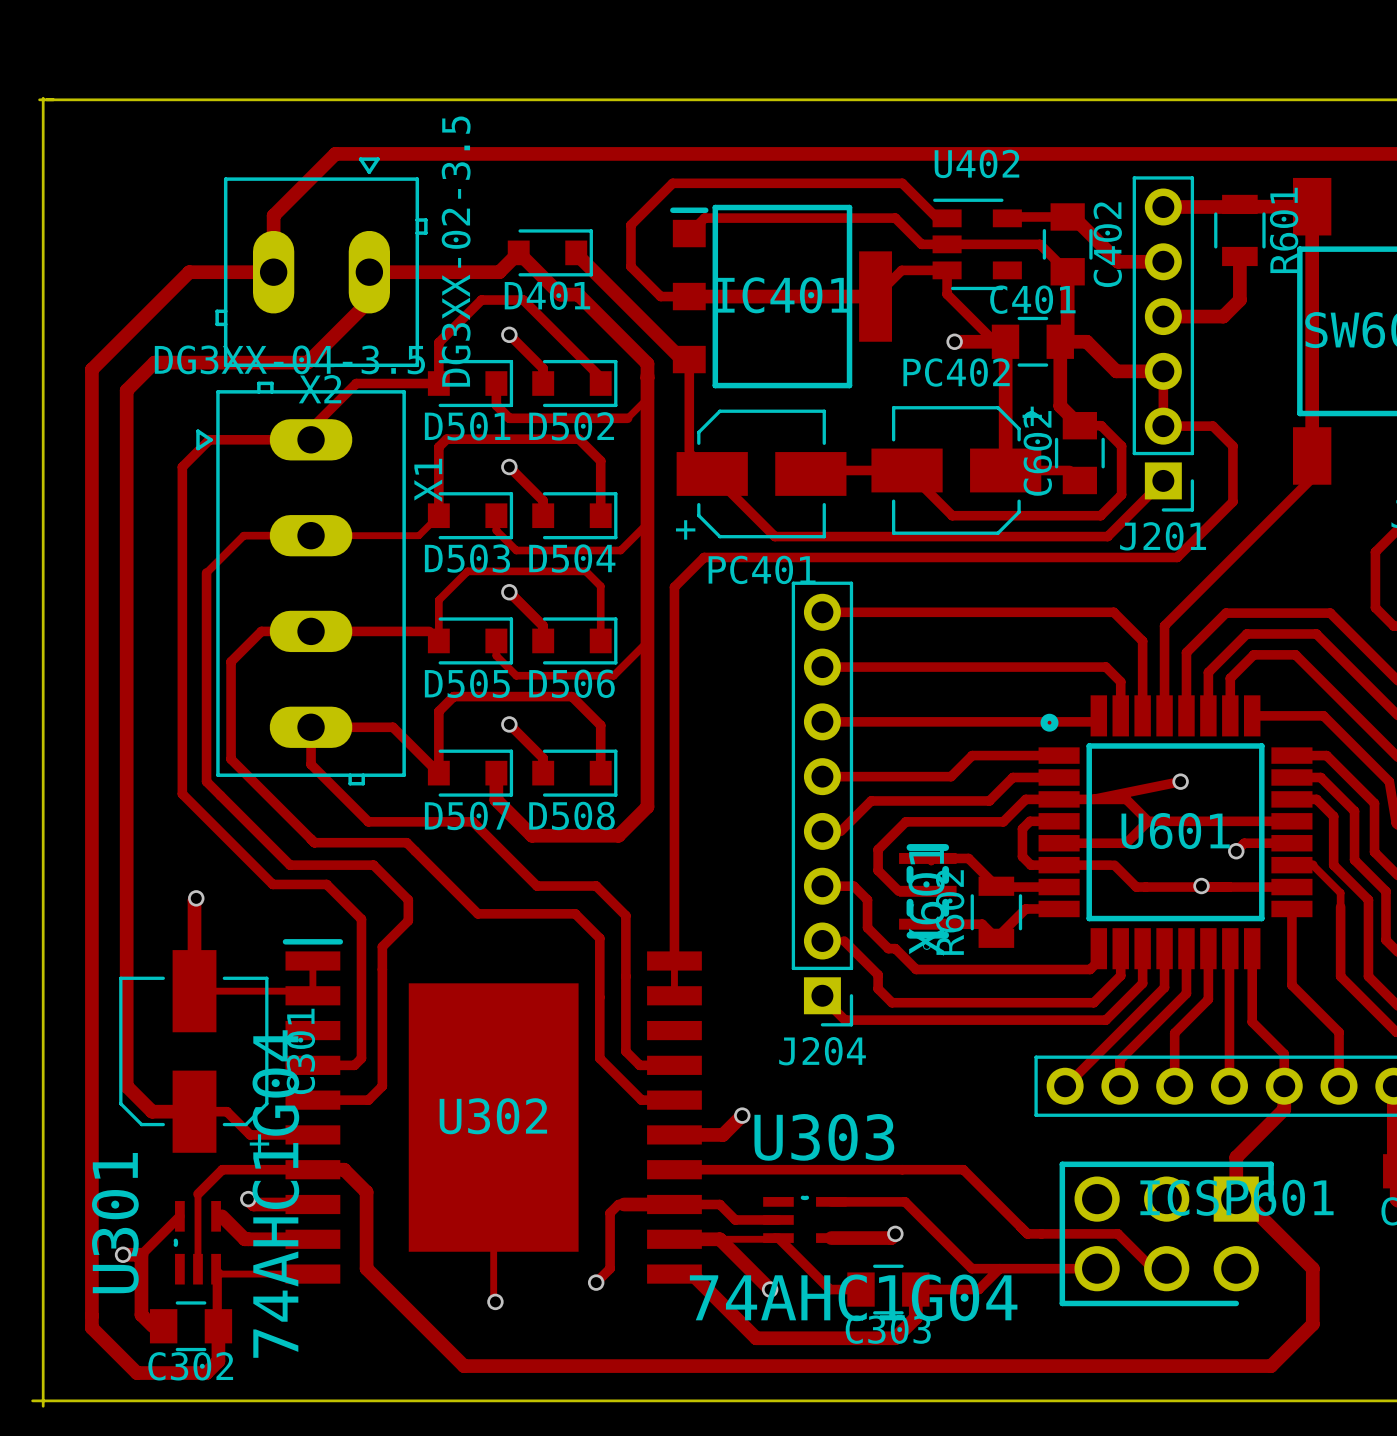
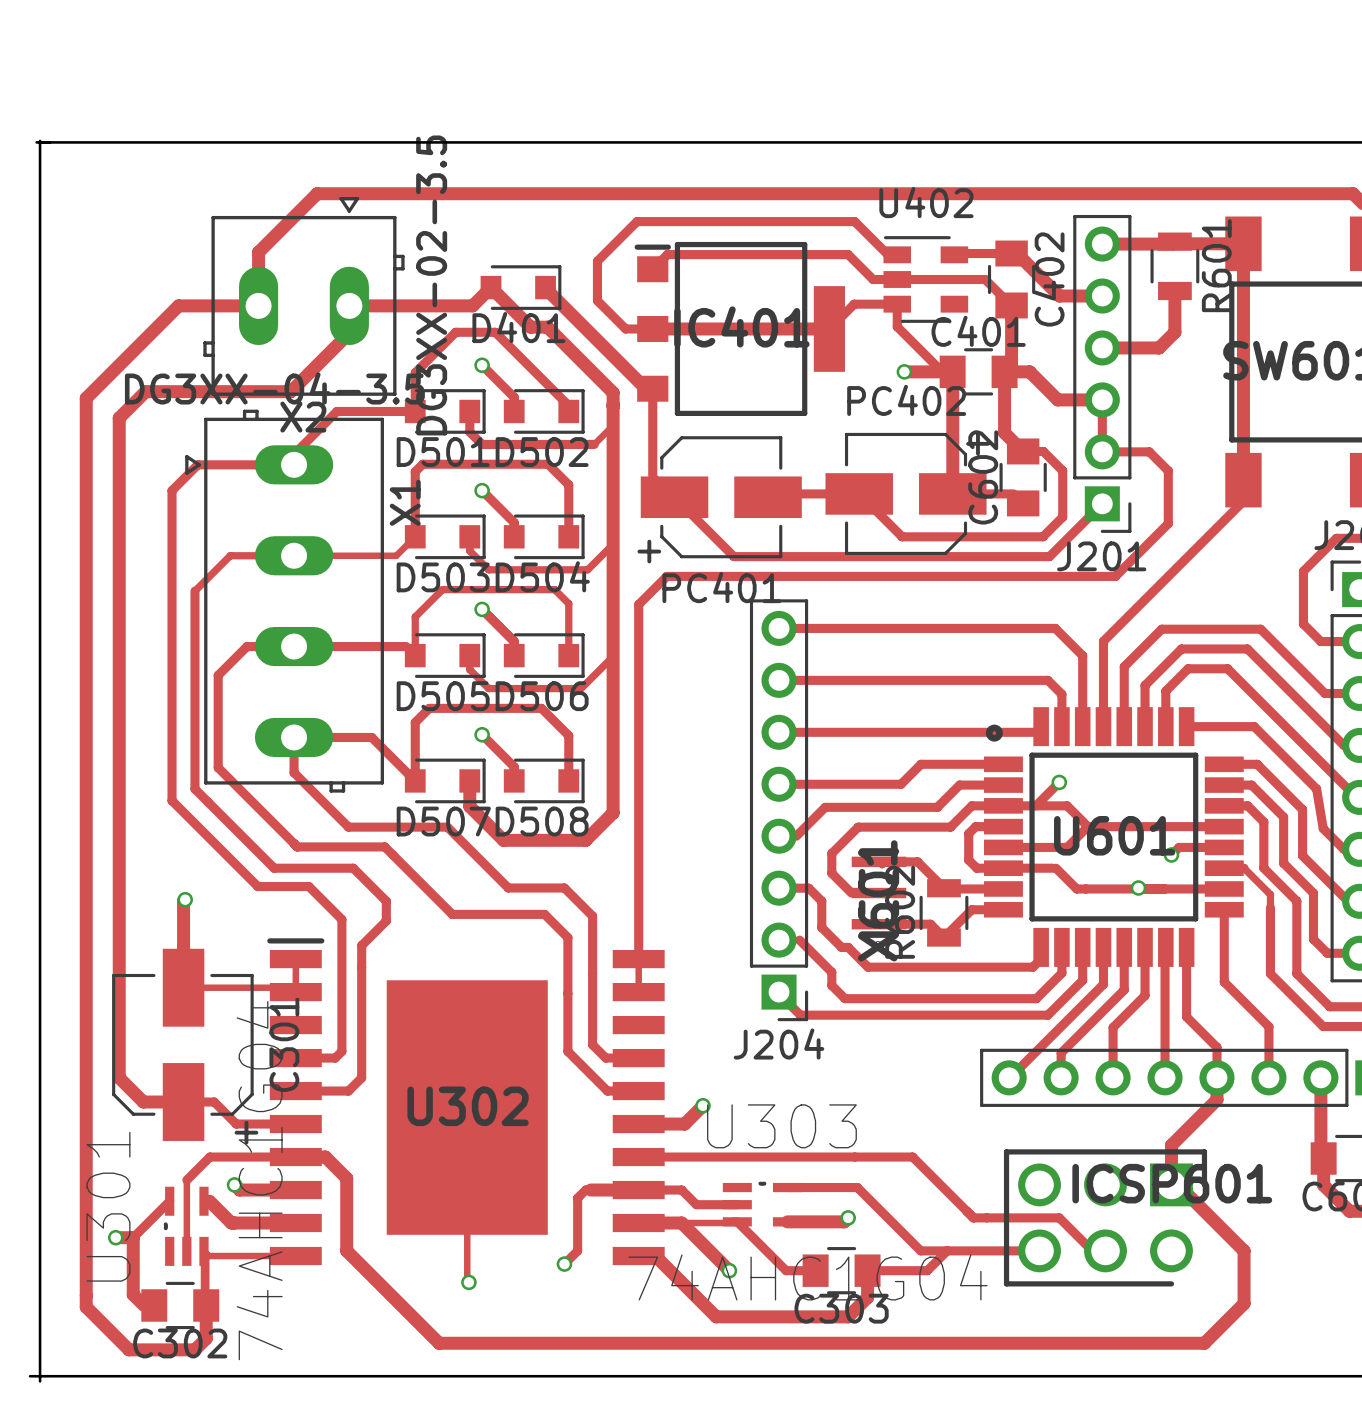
track: (1180, 781) (1093, 799) -> (1059, 782) (1035, 805)
via position: (1180, 781) -> (1059, 782)

